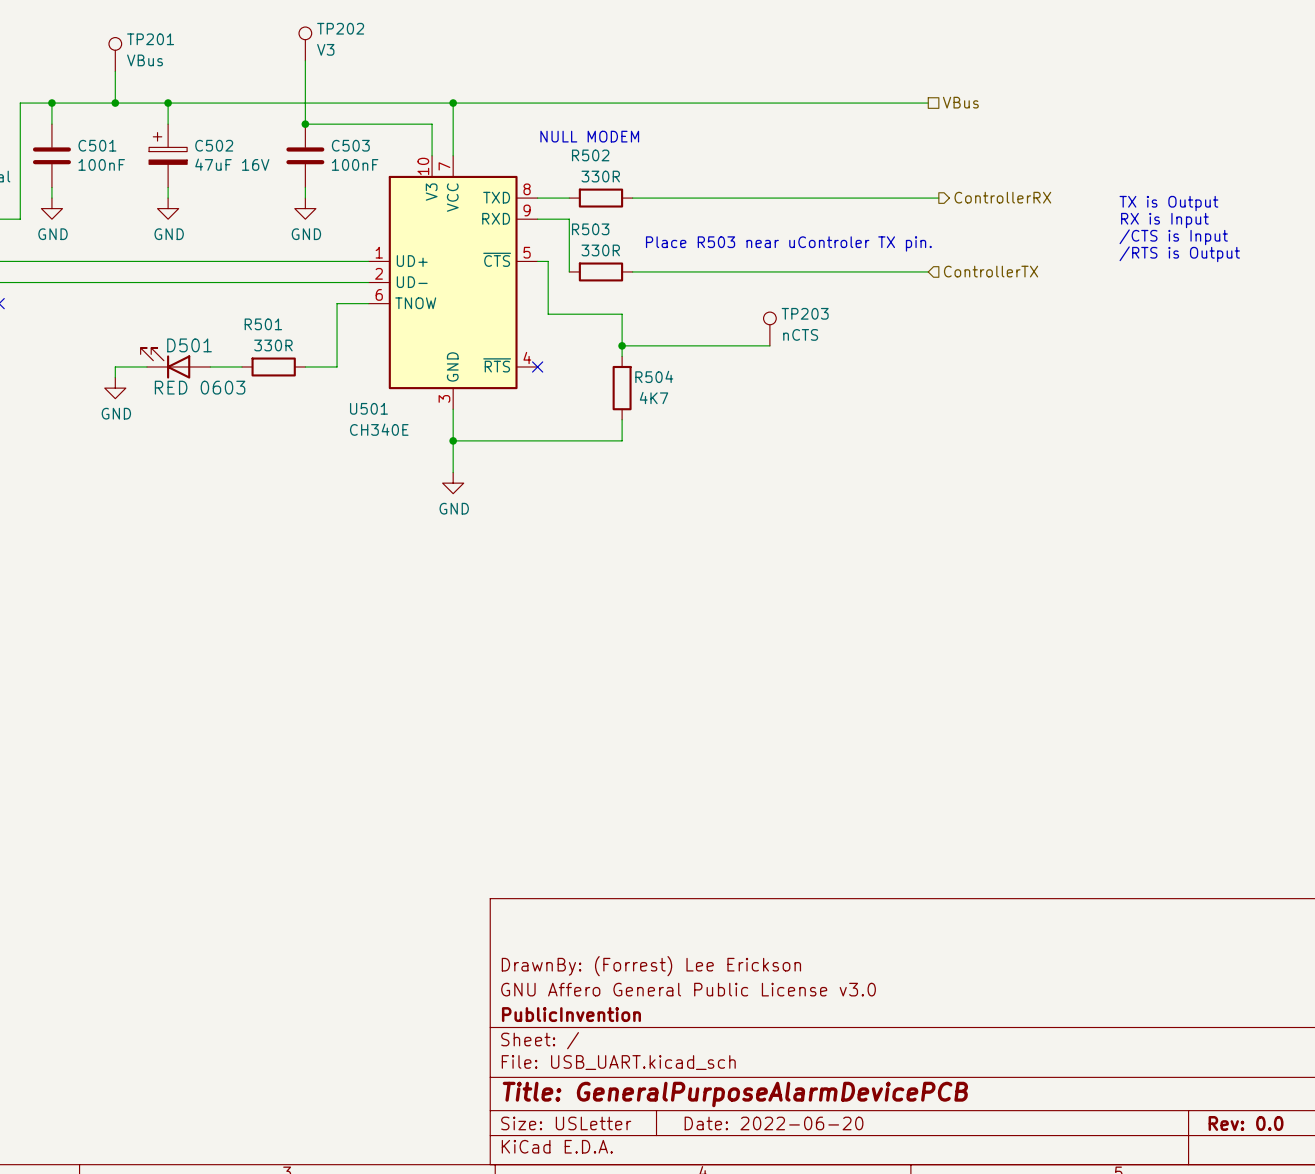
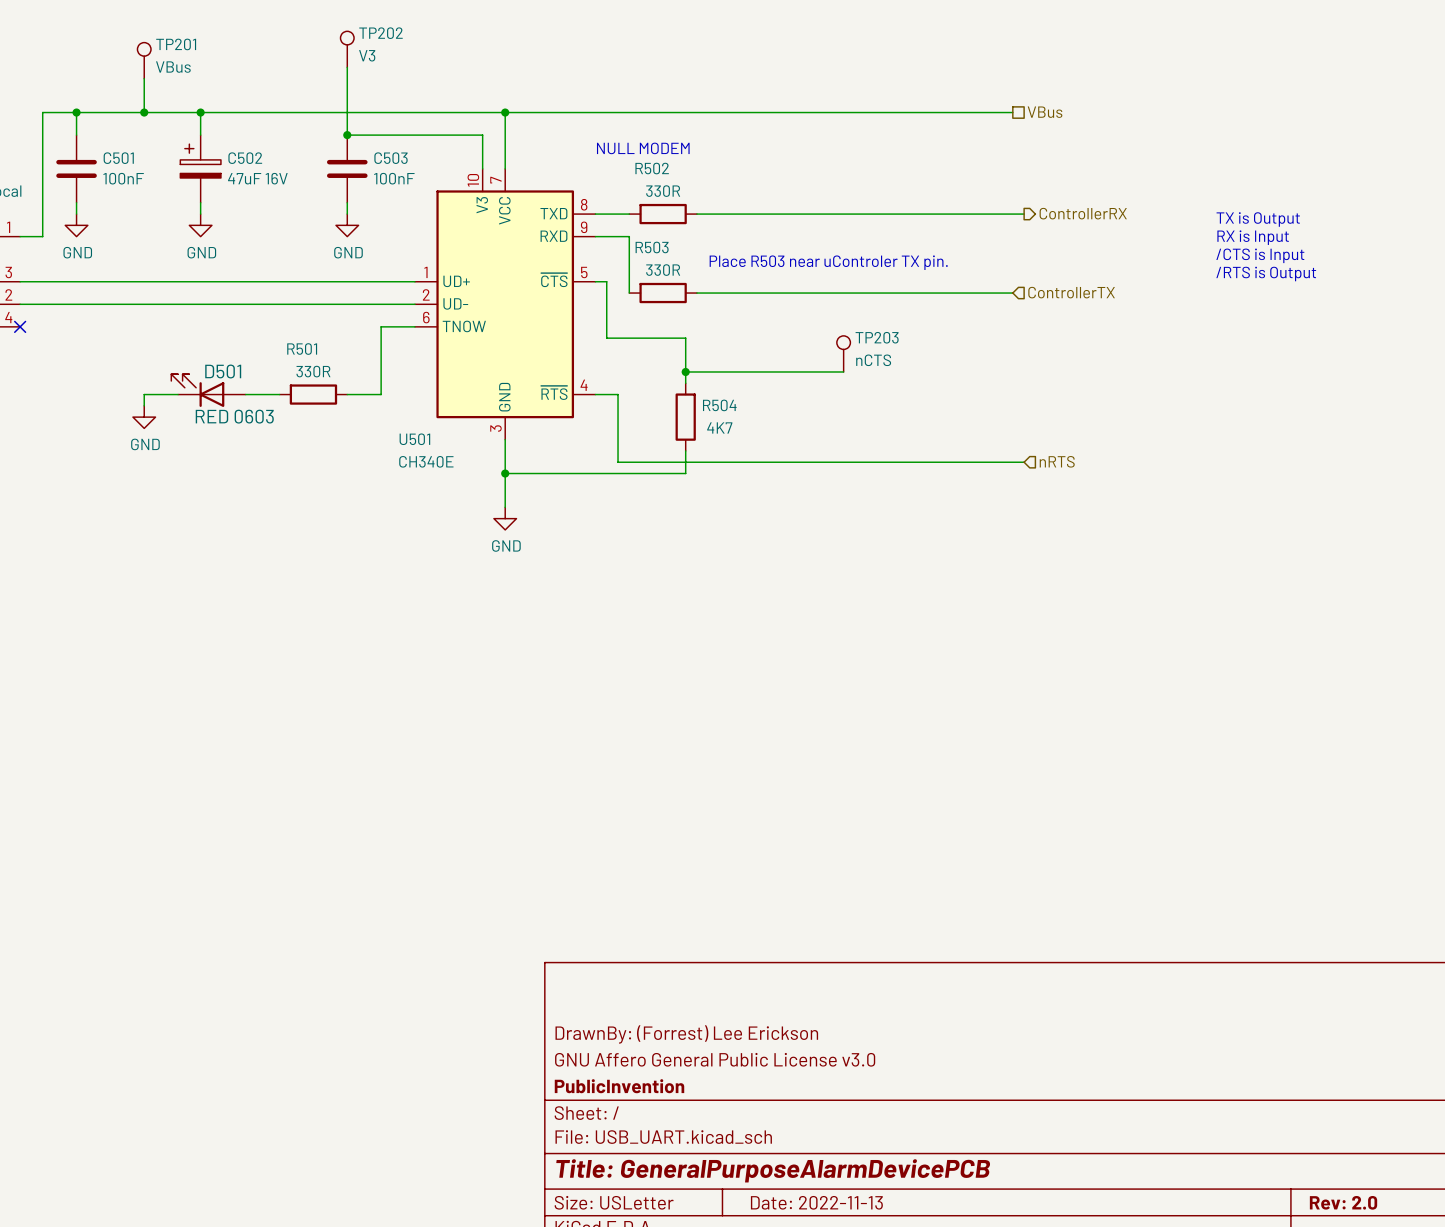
wire: none -> (595, 394) (618, 394) (618, 462) (1024, 462)
no-connect mark: (537, 366) -> none
hierarchical label: none -> nRTS (1057, 461)
title block: Date: 2022-06-20 (774, 1123) -> Date: 2022-11-13 (816, 1202)
title block: Rev: 0.0 (1246, 1123) -> Rev: 2.0 (1343, 1202)

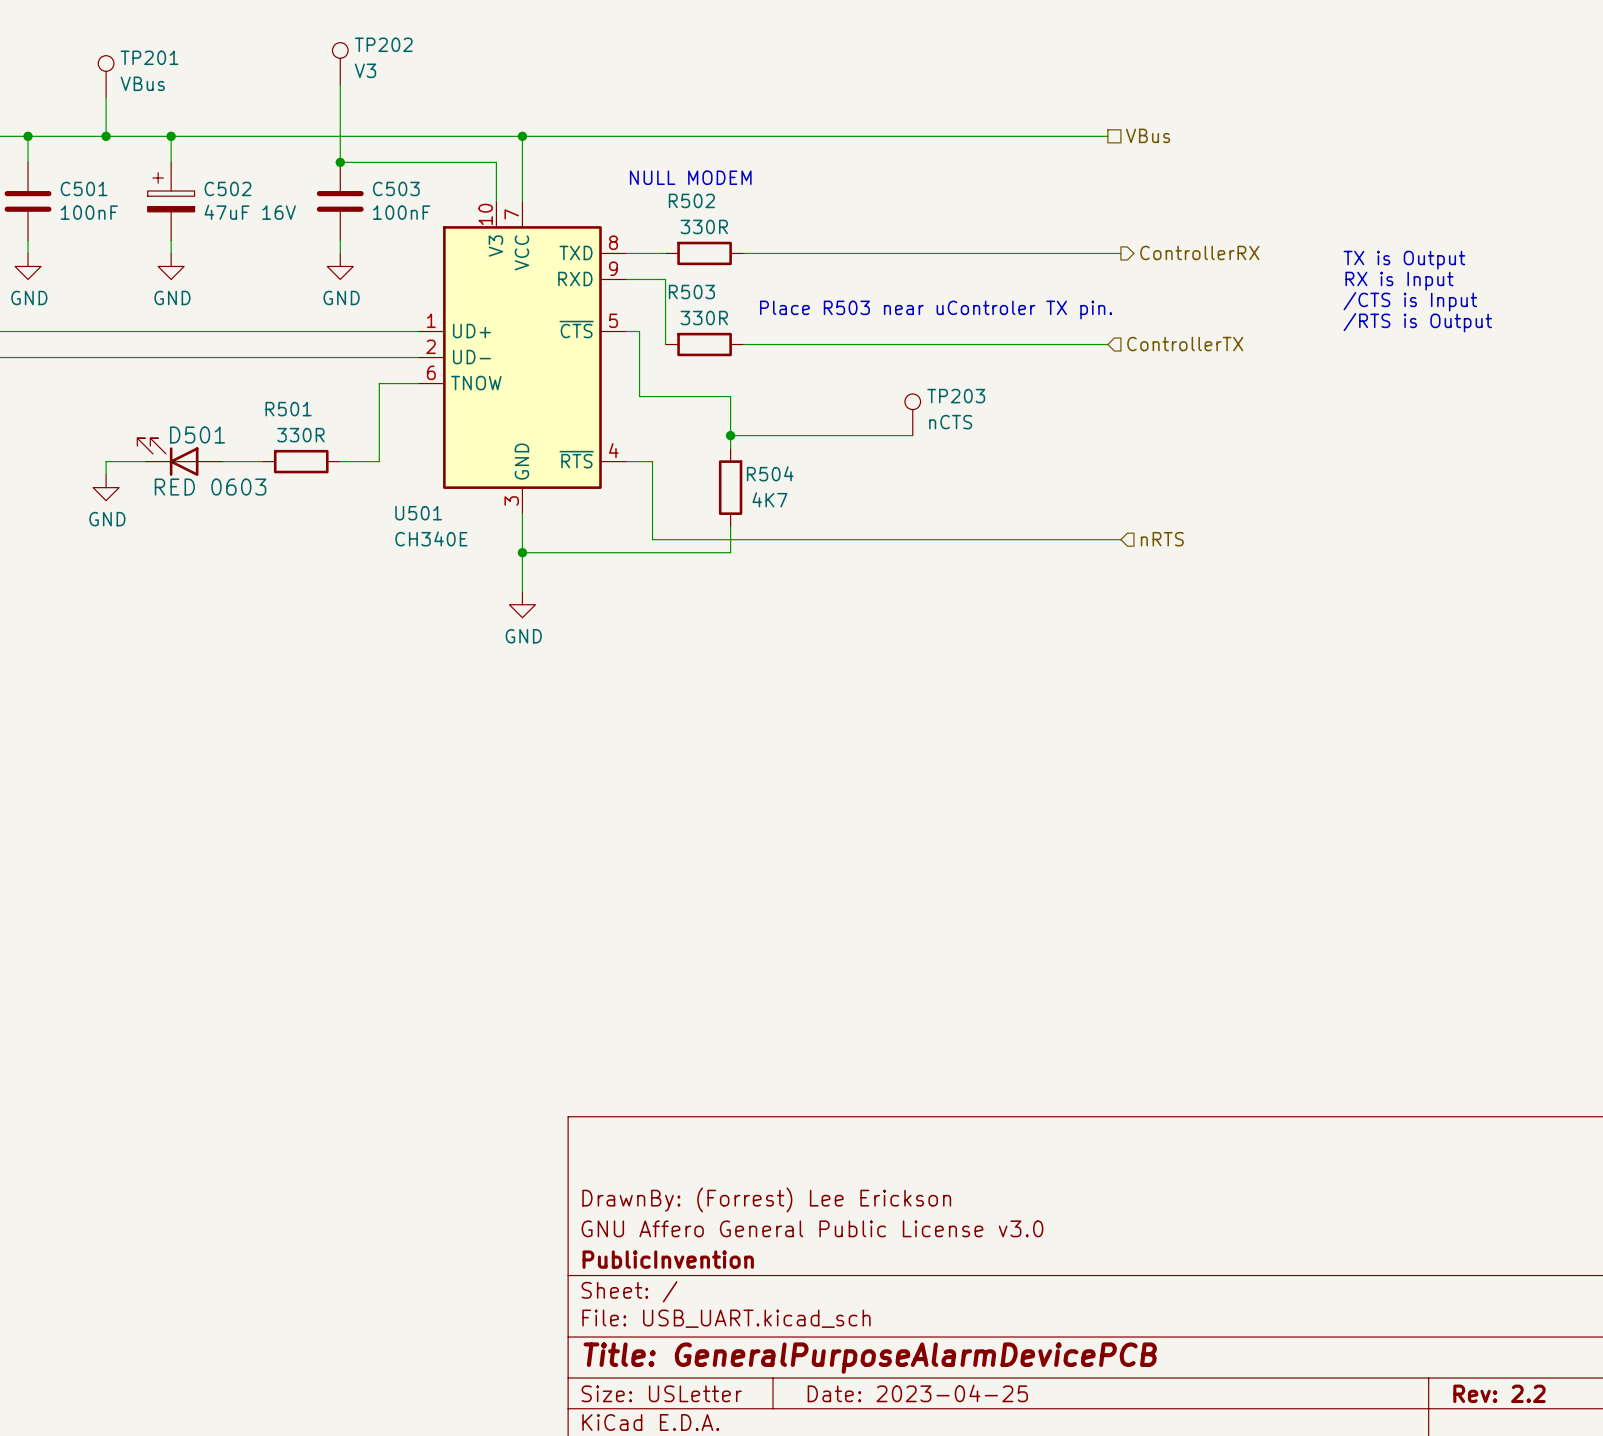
title block: Date: 2022-11-13 (816, 1202) -> Date: 2023-04-25 (917, 1393)
title block: Rev: 2.0 (1343, 1202) -> Rev: 2.2 (1499, 1393)

